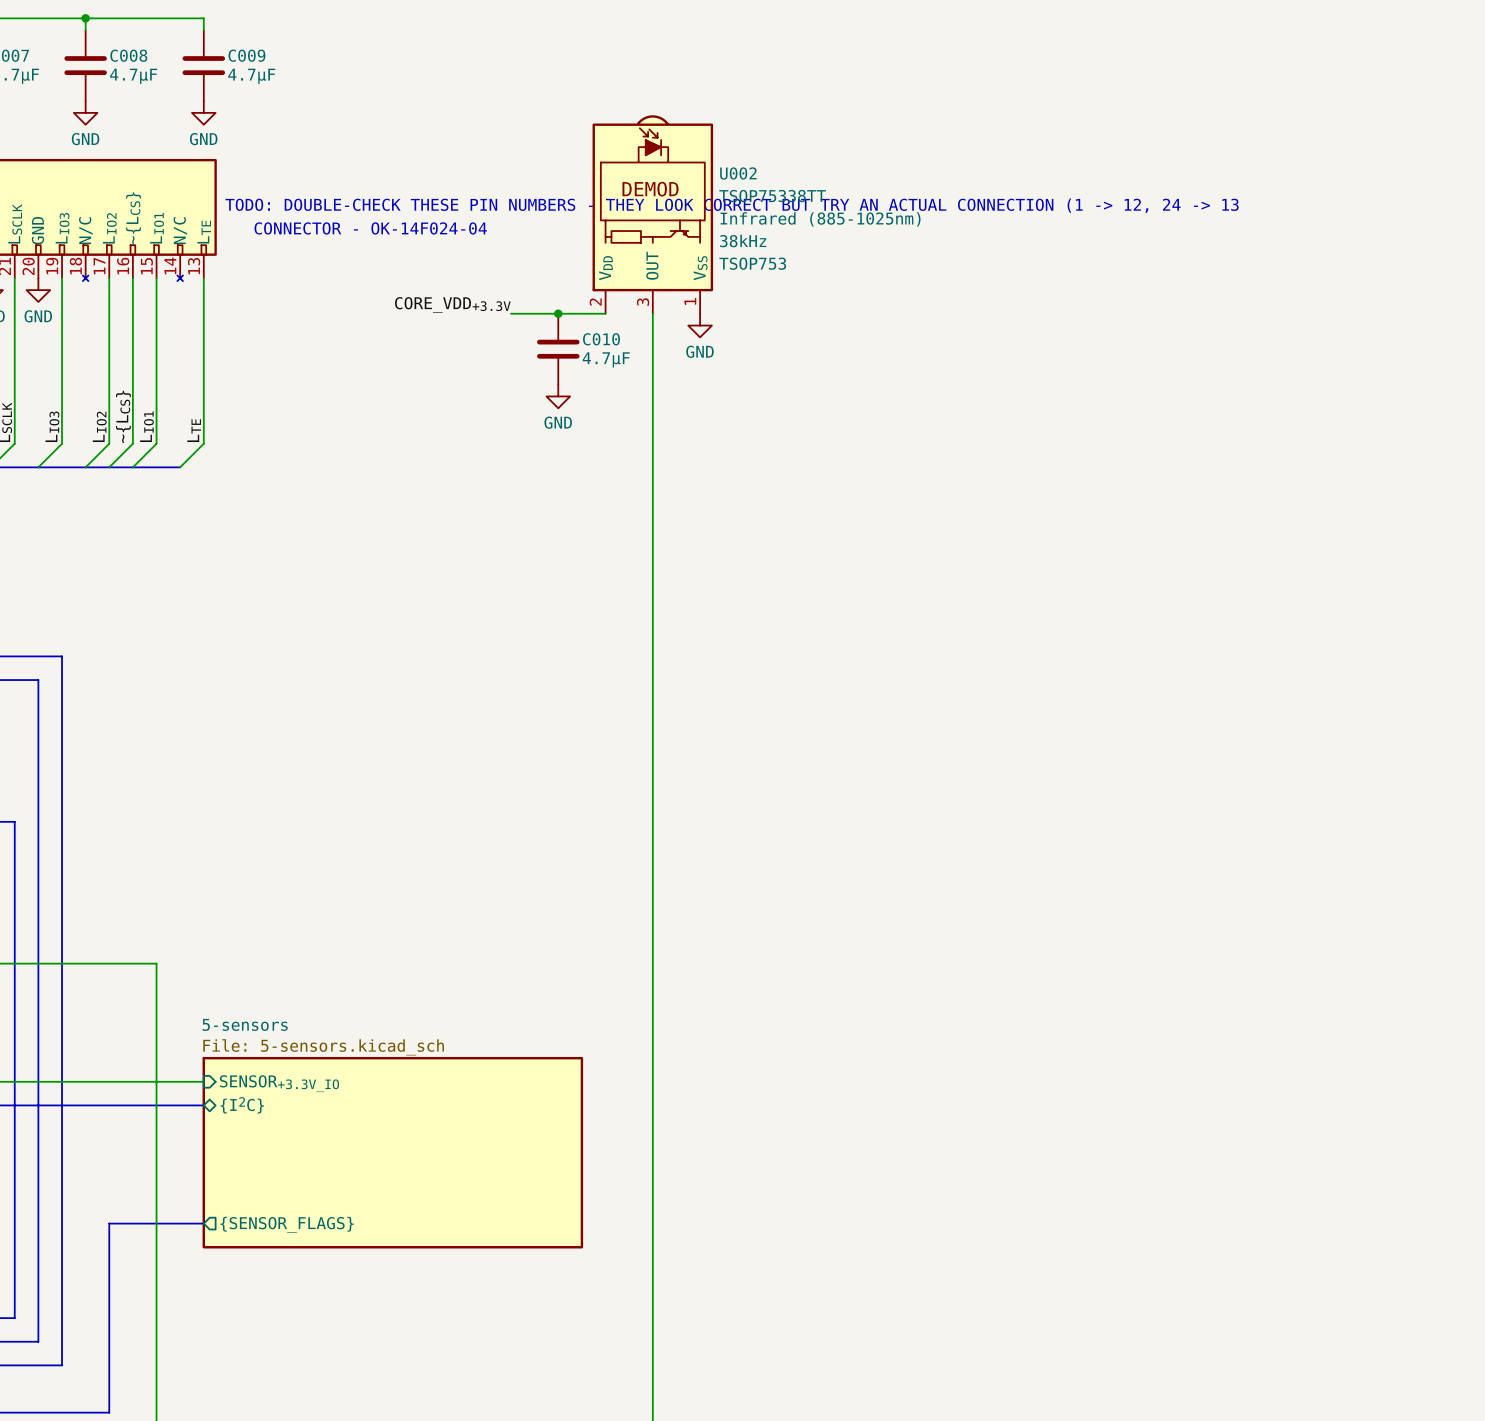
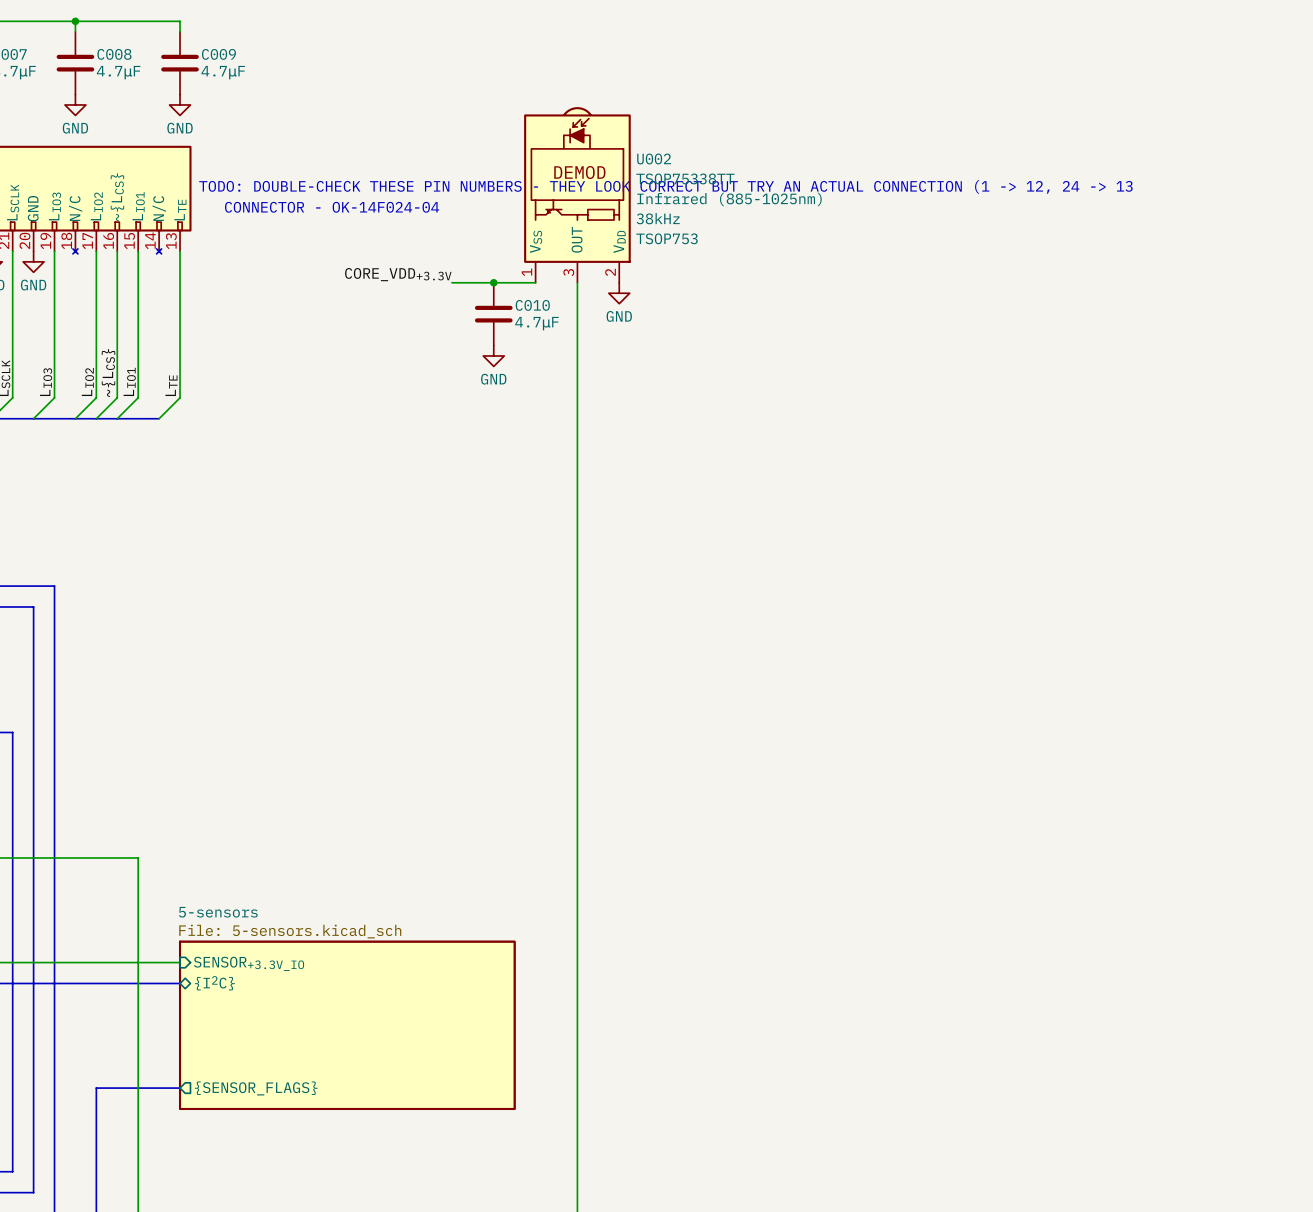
U002 flip: as is (652, 203) -> left-right (577, 185)

